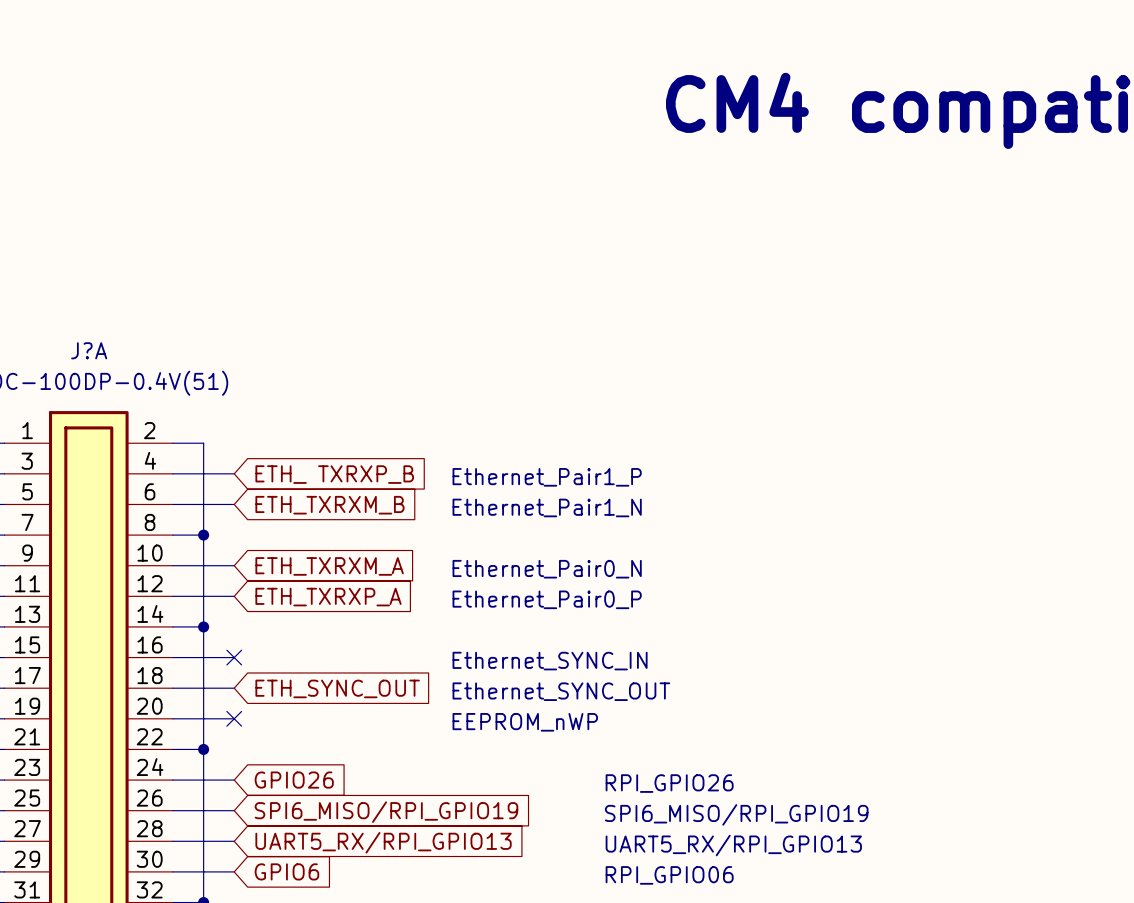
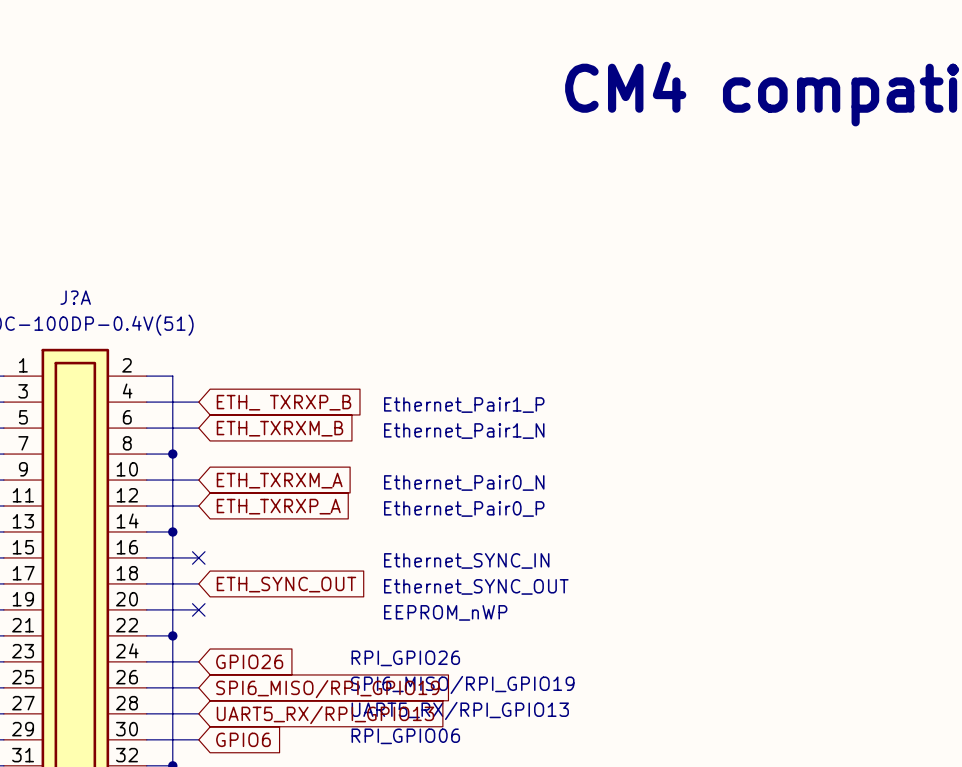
text position: RPI_GPIO26 (669, 783) -> RPI_GPIO26 (405, 658)
text position: SPI6_MISO/RPI_GPIO19 (736, 814) -> SPI6_MISO/RPI_GPIO19 (462, 684)
text position: UART5_RX/RPI_GPIO13 (733, 845) -> UART5_RX/RPI_GPIO13 (460, 710)
text position: RPI_GPIO06 (669, 875) -> RPI_GPIO06 (405, 736)

